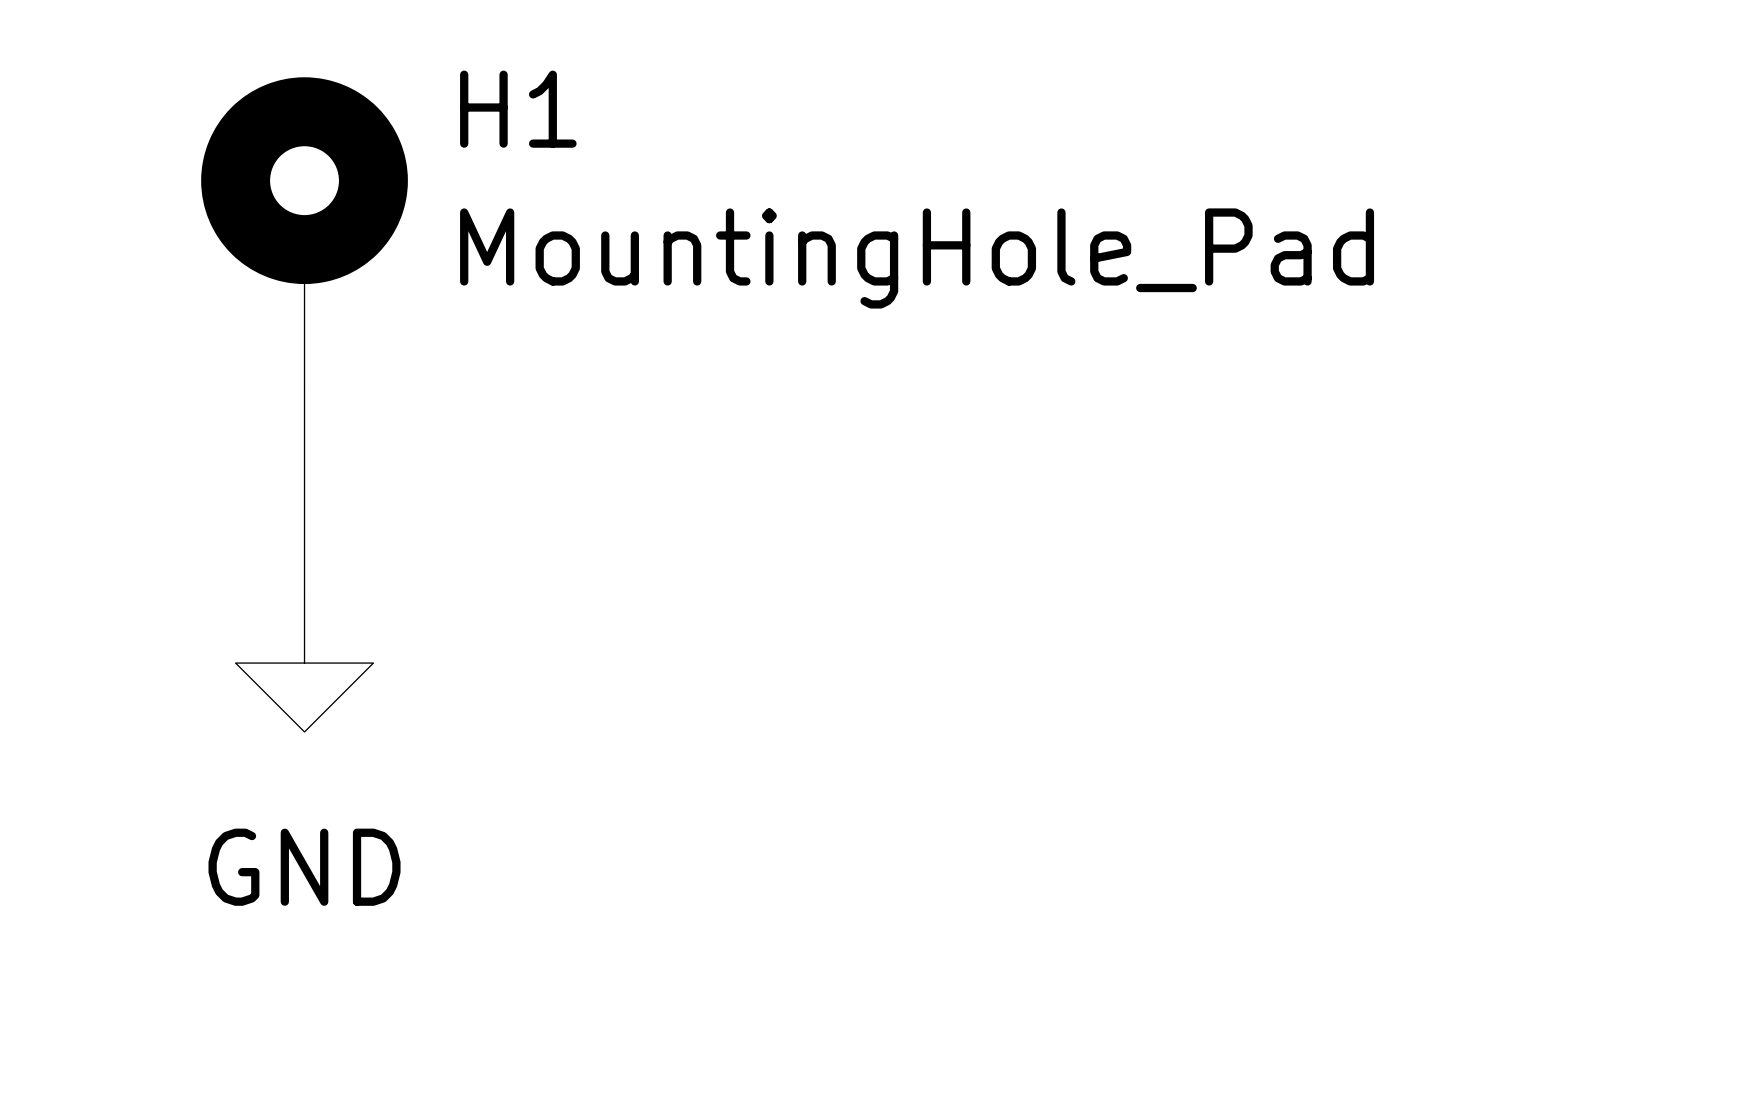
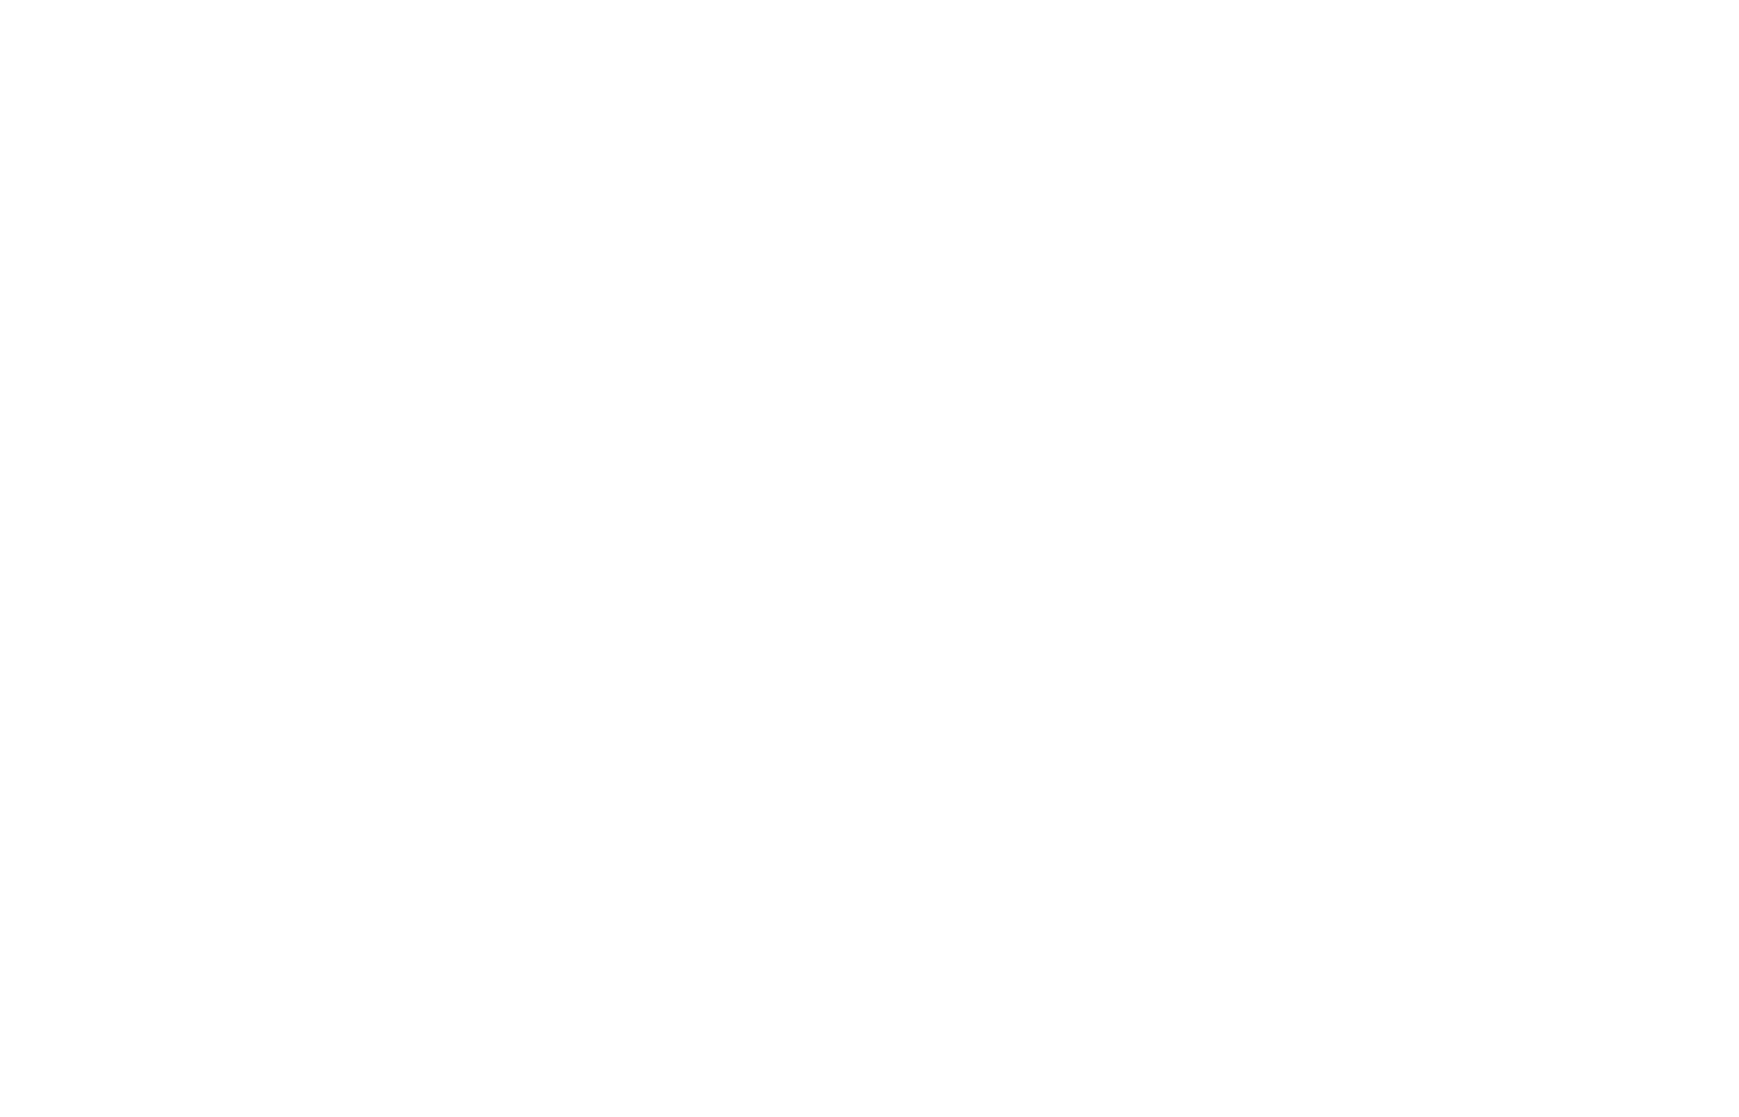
H1: MountingHole_Pad (304, 232) -> none
wire: (304, 387) (304, 594) -> none
power symbol: GND (304, 663) -> none

